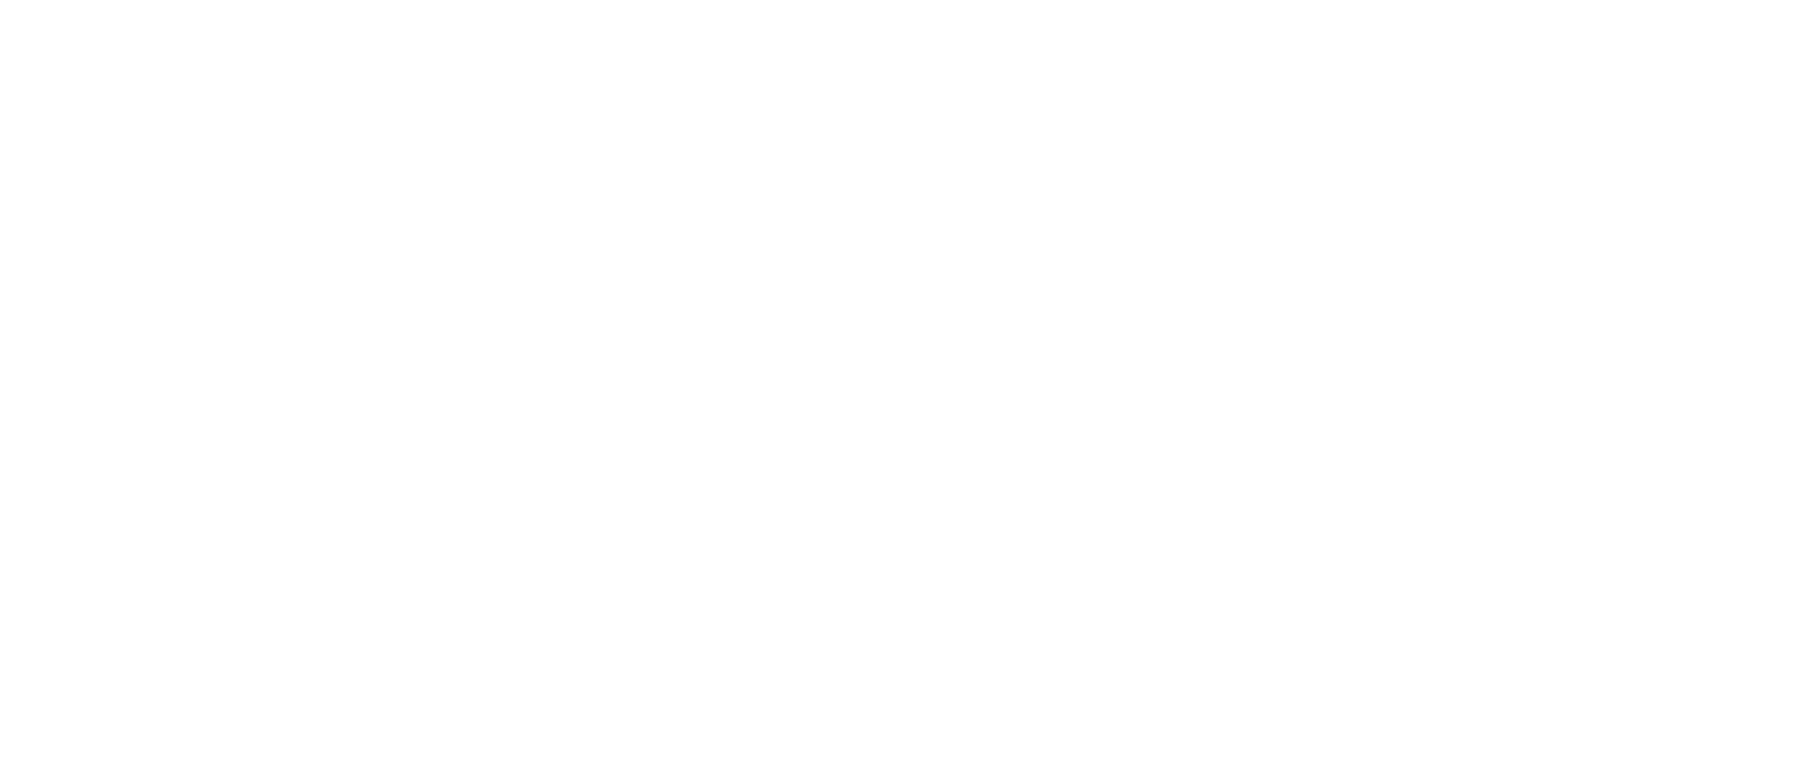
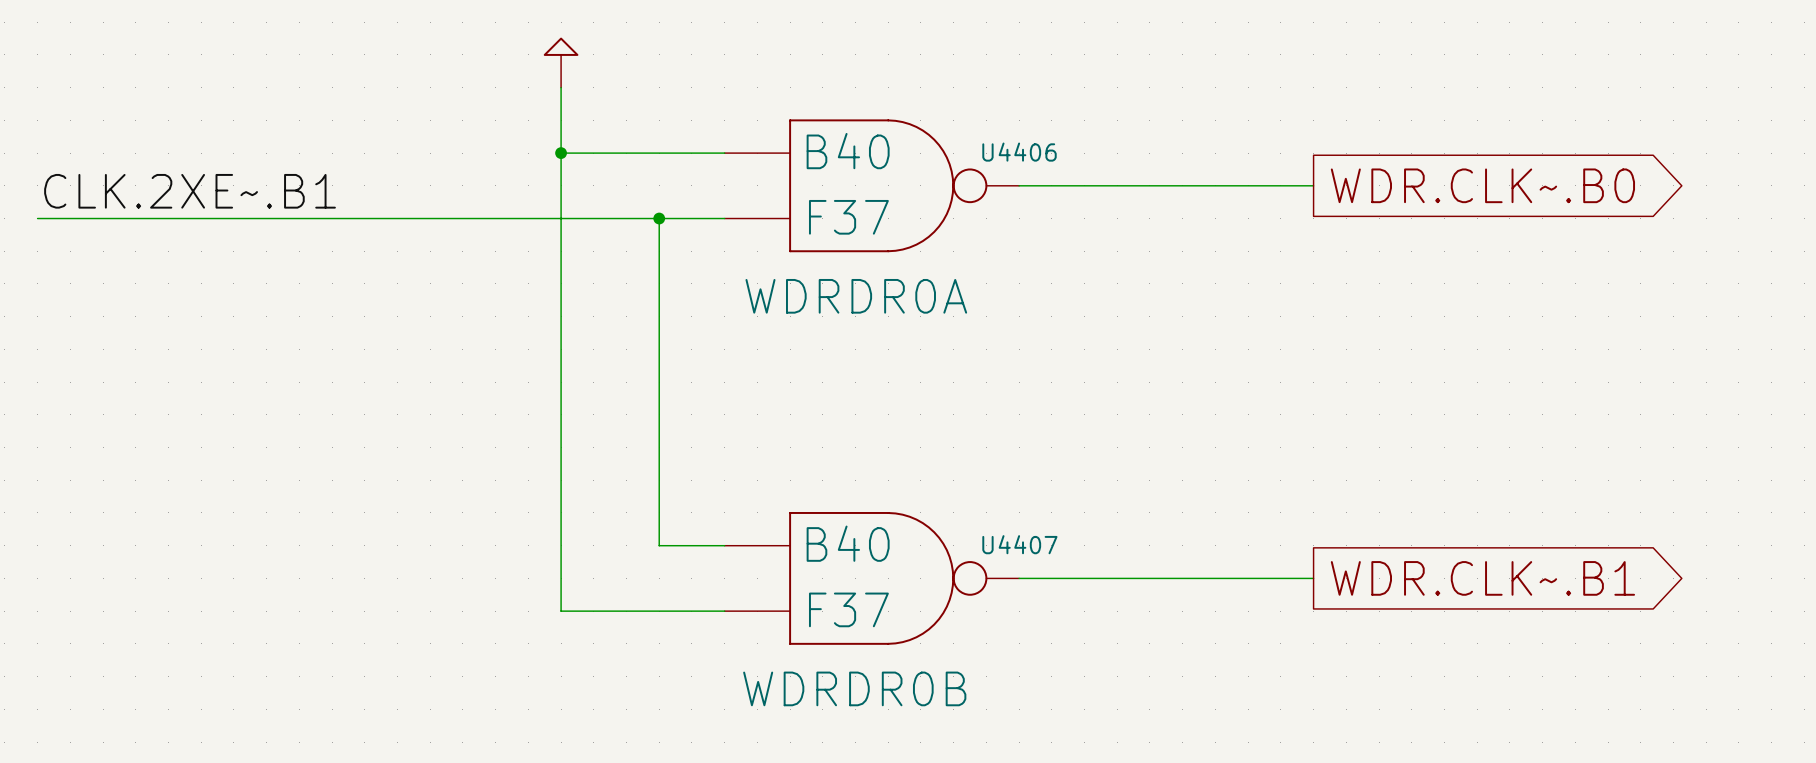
power symbol: none -> (561, 62)
wire: none -> (561, 87) (561, 611) (724, 611)
wire: none -> (561, 153) (724, 153)
junction: none -> (561, 153)
U4406: none -> F37 (871, 185)
wire: none -> (1019, 185) (1313, 185)
global label: none -> WDR.CLK~.B0 (1482, 185)
label: none -> CLK.2XE~.B1 (190, 191)
wire: none -> (37, 218) (724, 218)
wire: none -> (659, 218) (659, 545) (724, 545)
junction: none -> (659, 218)
U4407: none -> F37 (871, 578)
wire: none -> (1019, 578) (1313, 578)
global label: none -> WDR.CLK~.B1 (1482, 578)

